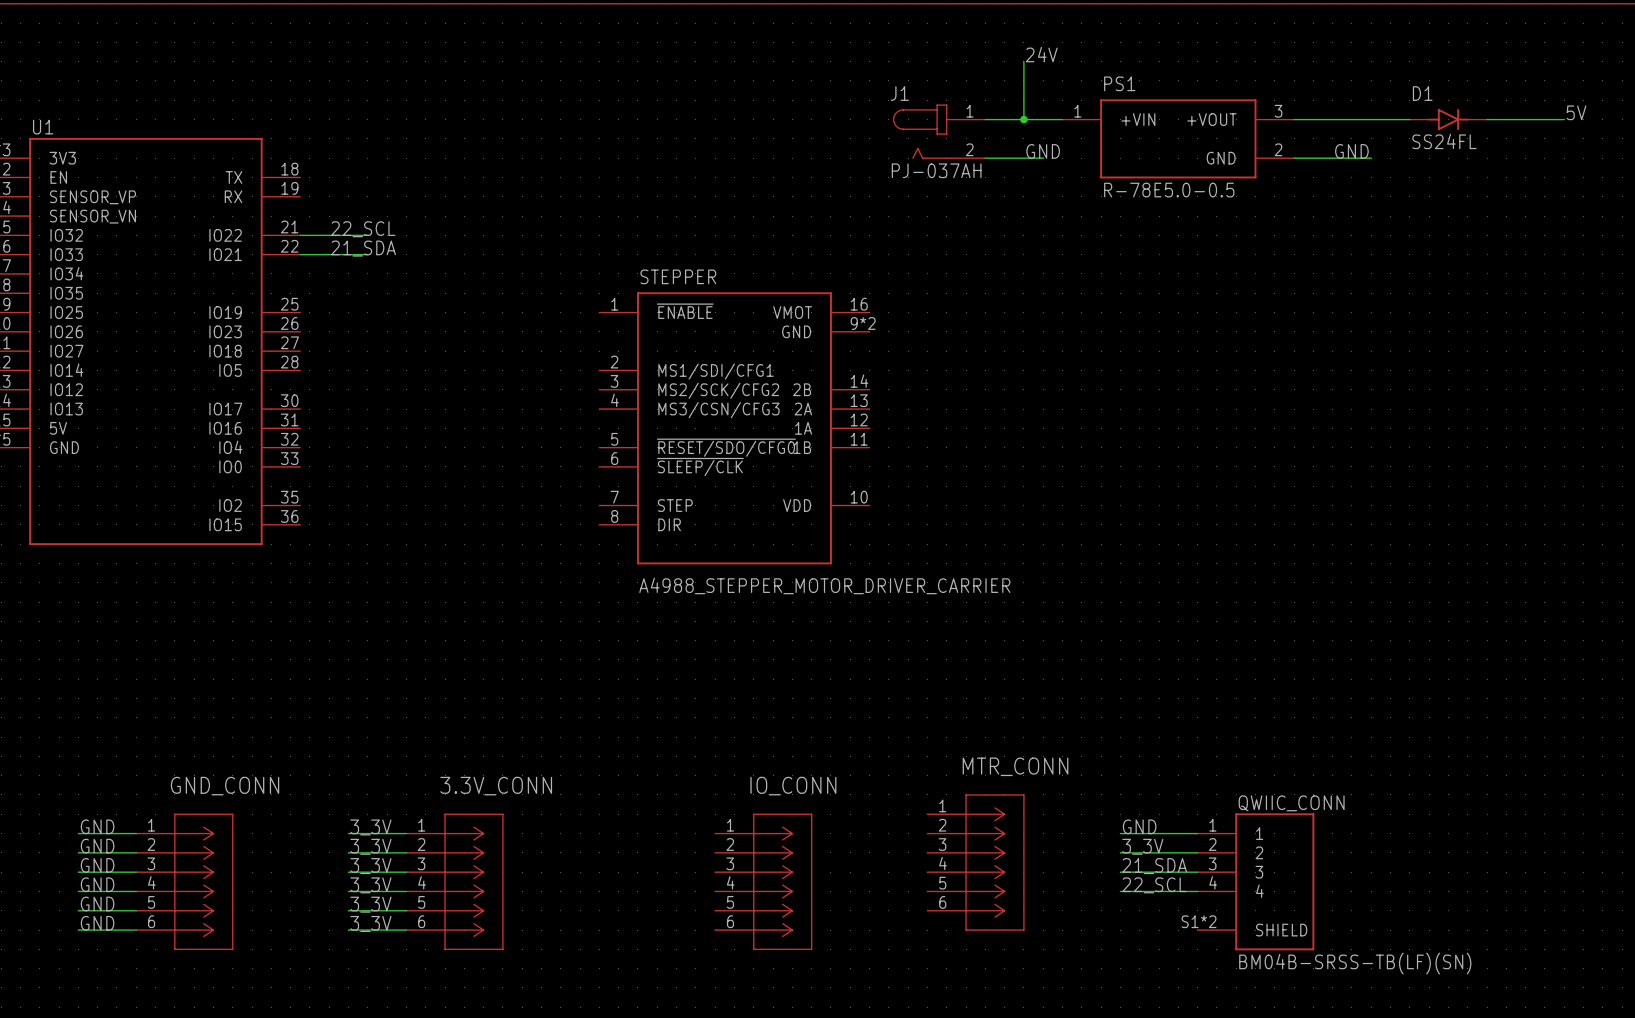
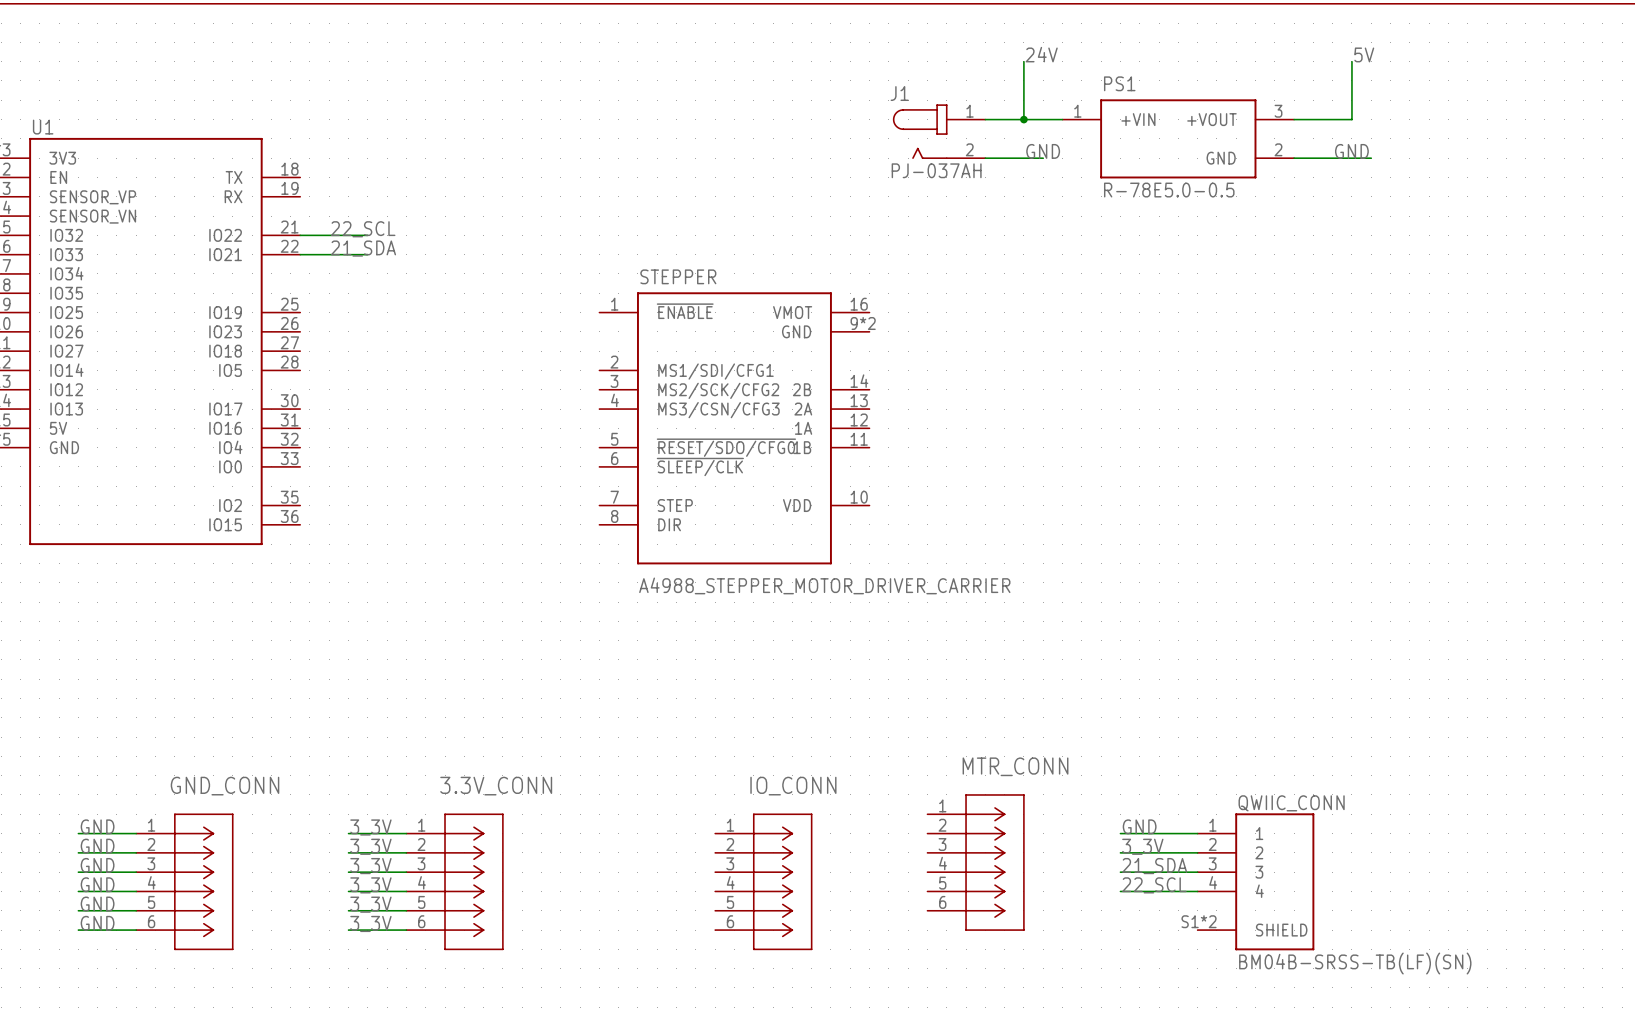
label: none -> 5V (1364, 54)
label: 5V (1576, 112) -> none
wire: (1351, 119) (1409, 119) -> (1351, 119) (1351, 61)
D1: SS24FL (1448, 119) -> none
wire: (1487, 119) (1564, 119) -> none

